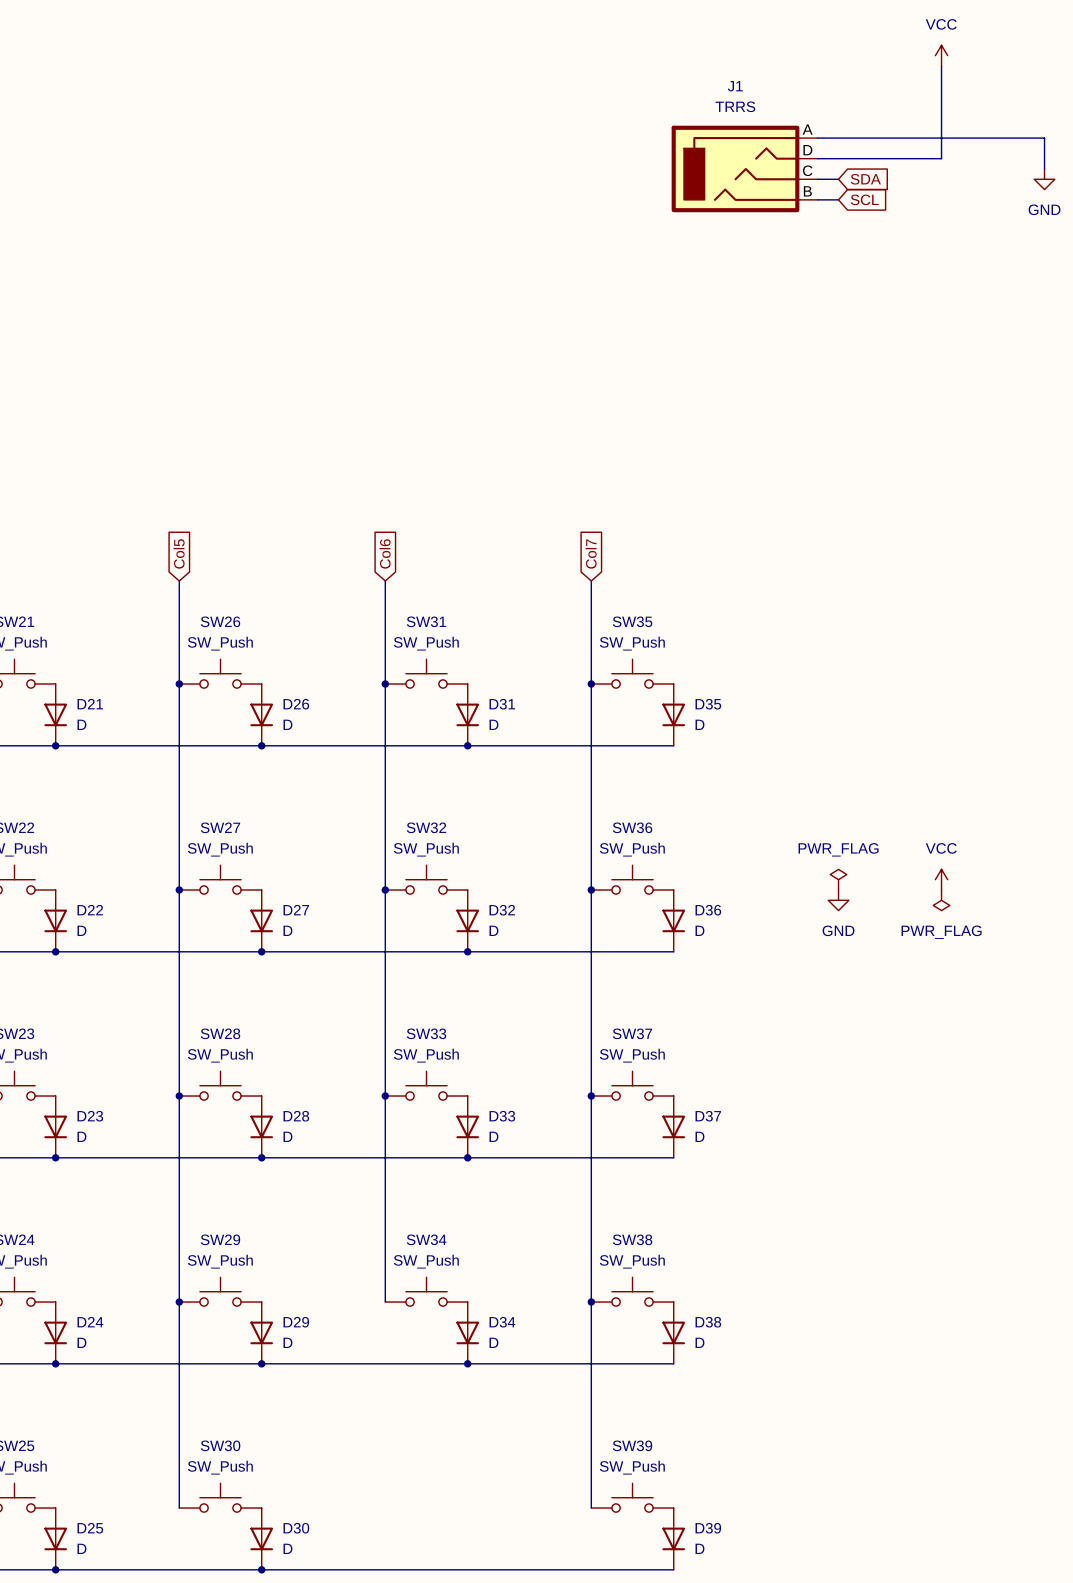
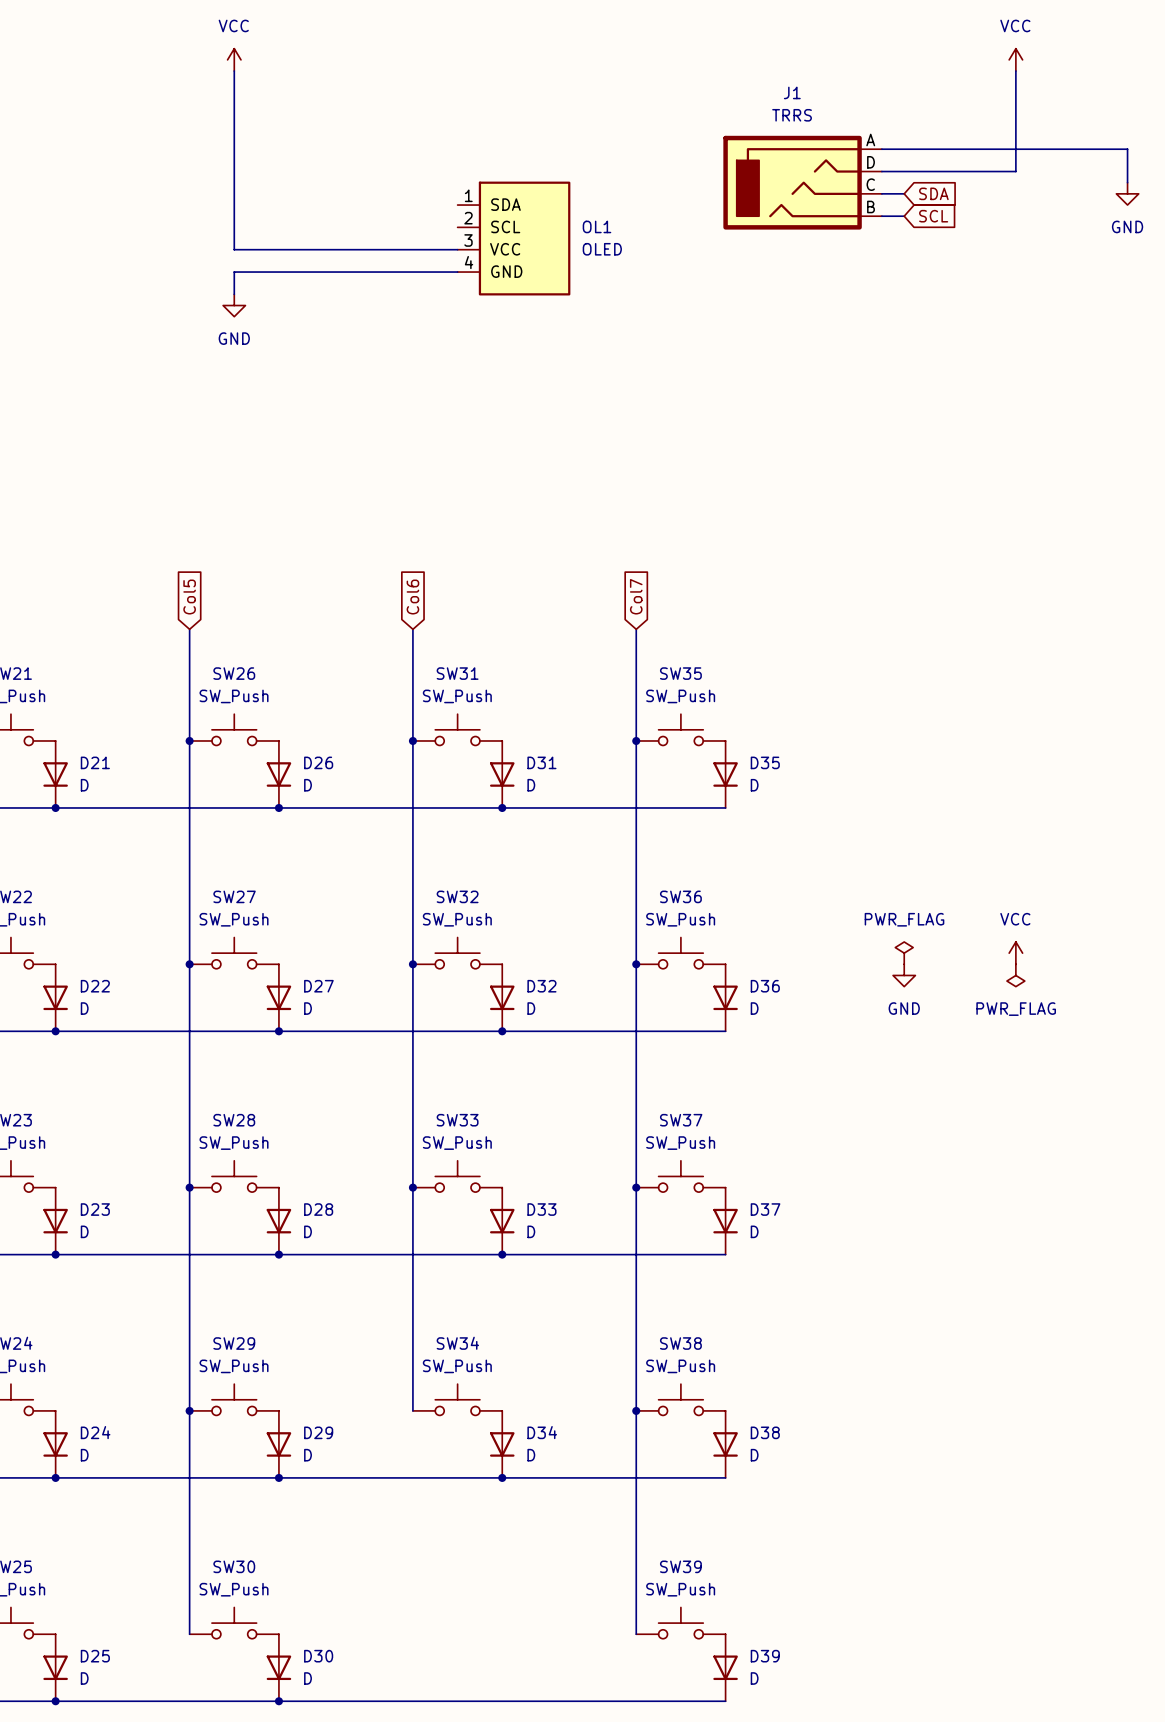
power symbol: none -> VCC (234, 59)
wire: none -> (234, 71) (234, 249) (457, 249)
OL1: none -> OLED (513, 238)
wire: none -> (457, 272) (234, 272) (234, 294)
power symbol: none -> GND (234, 305)

